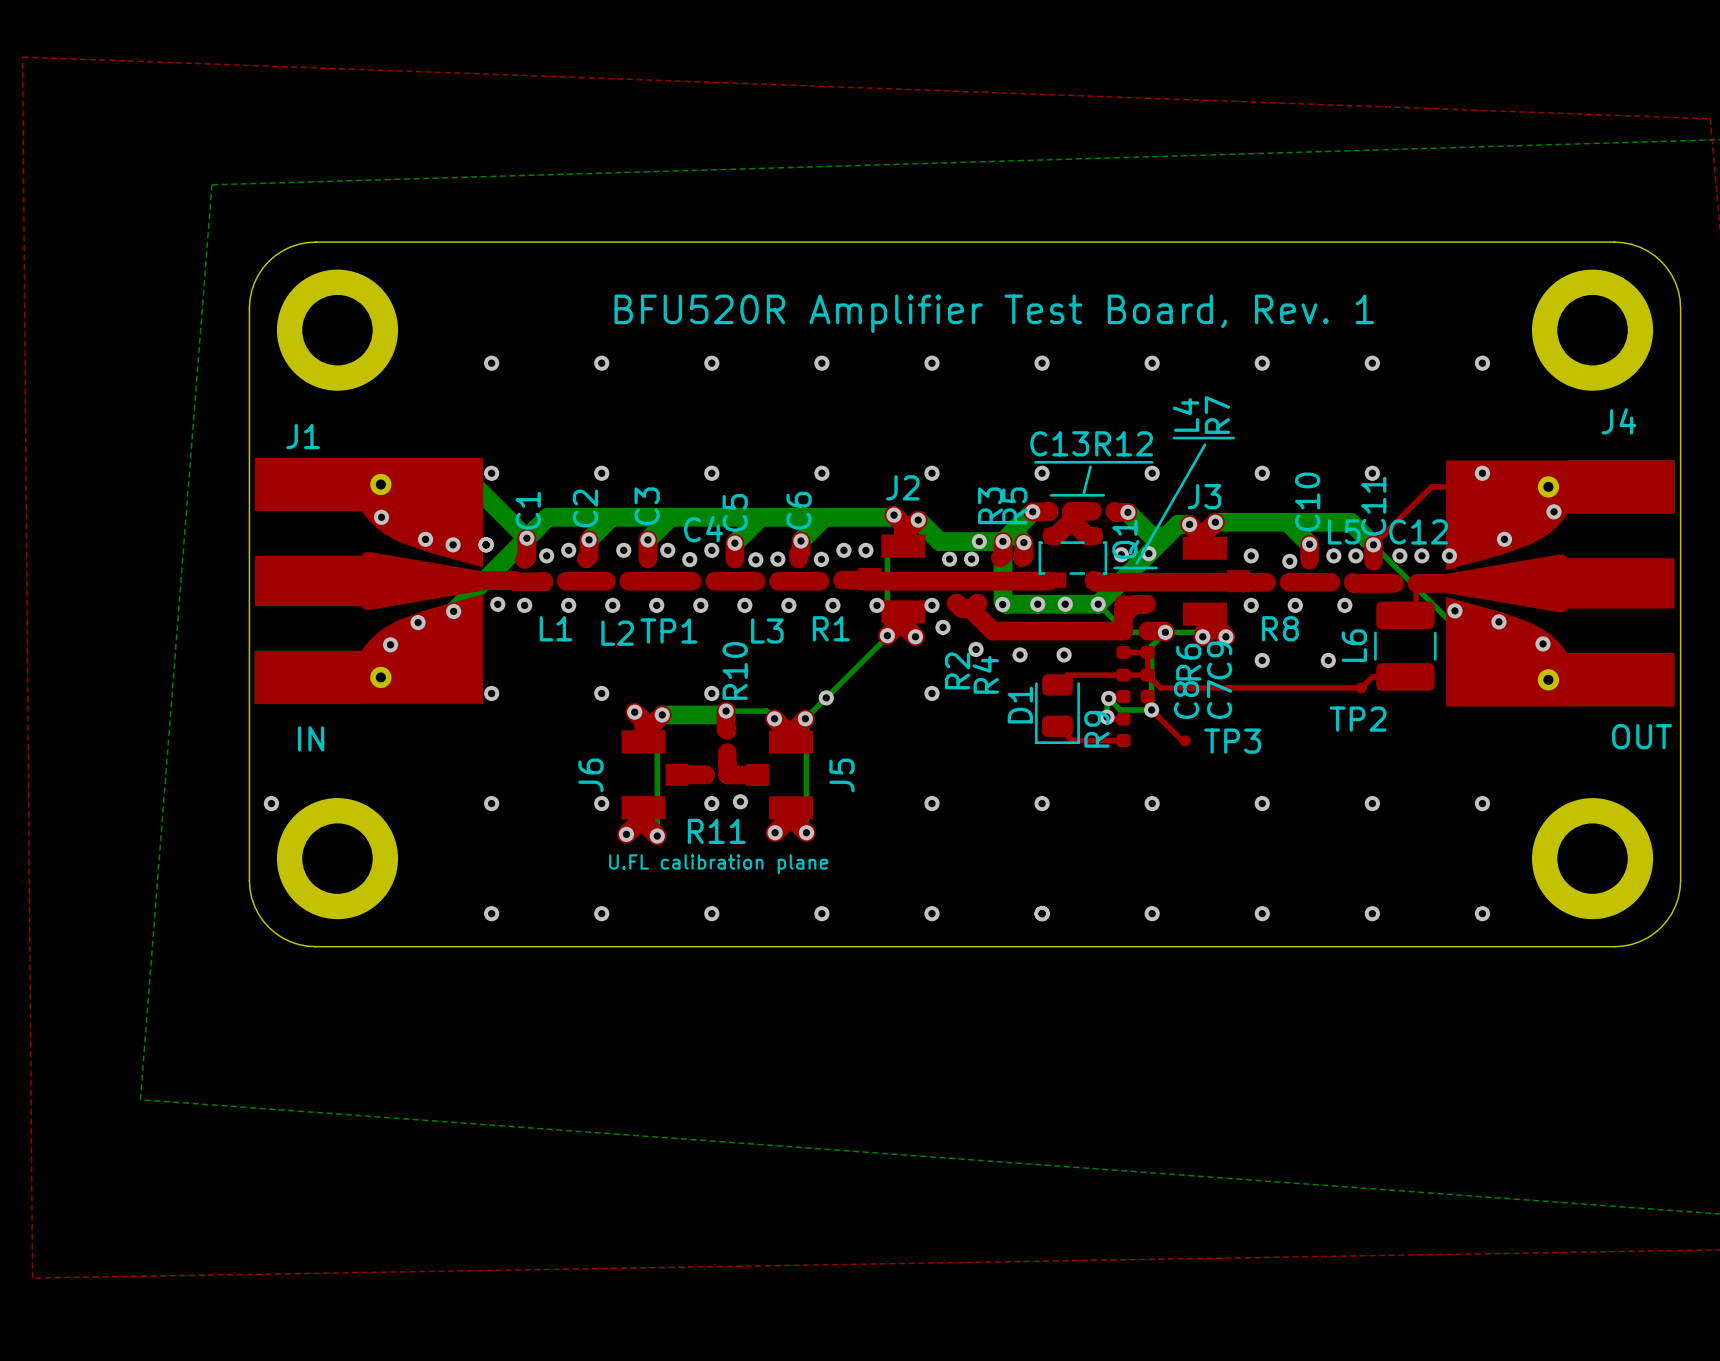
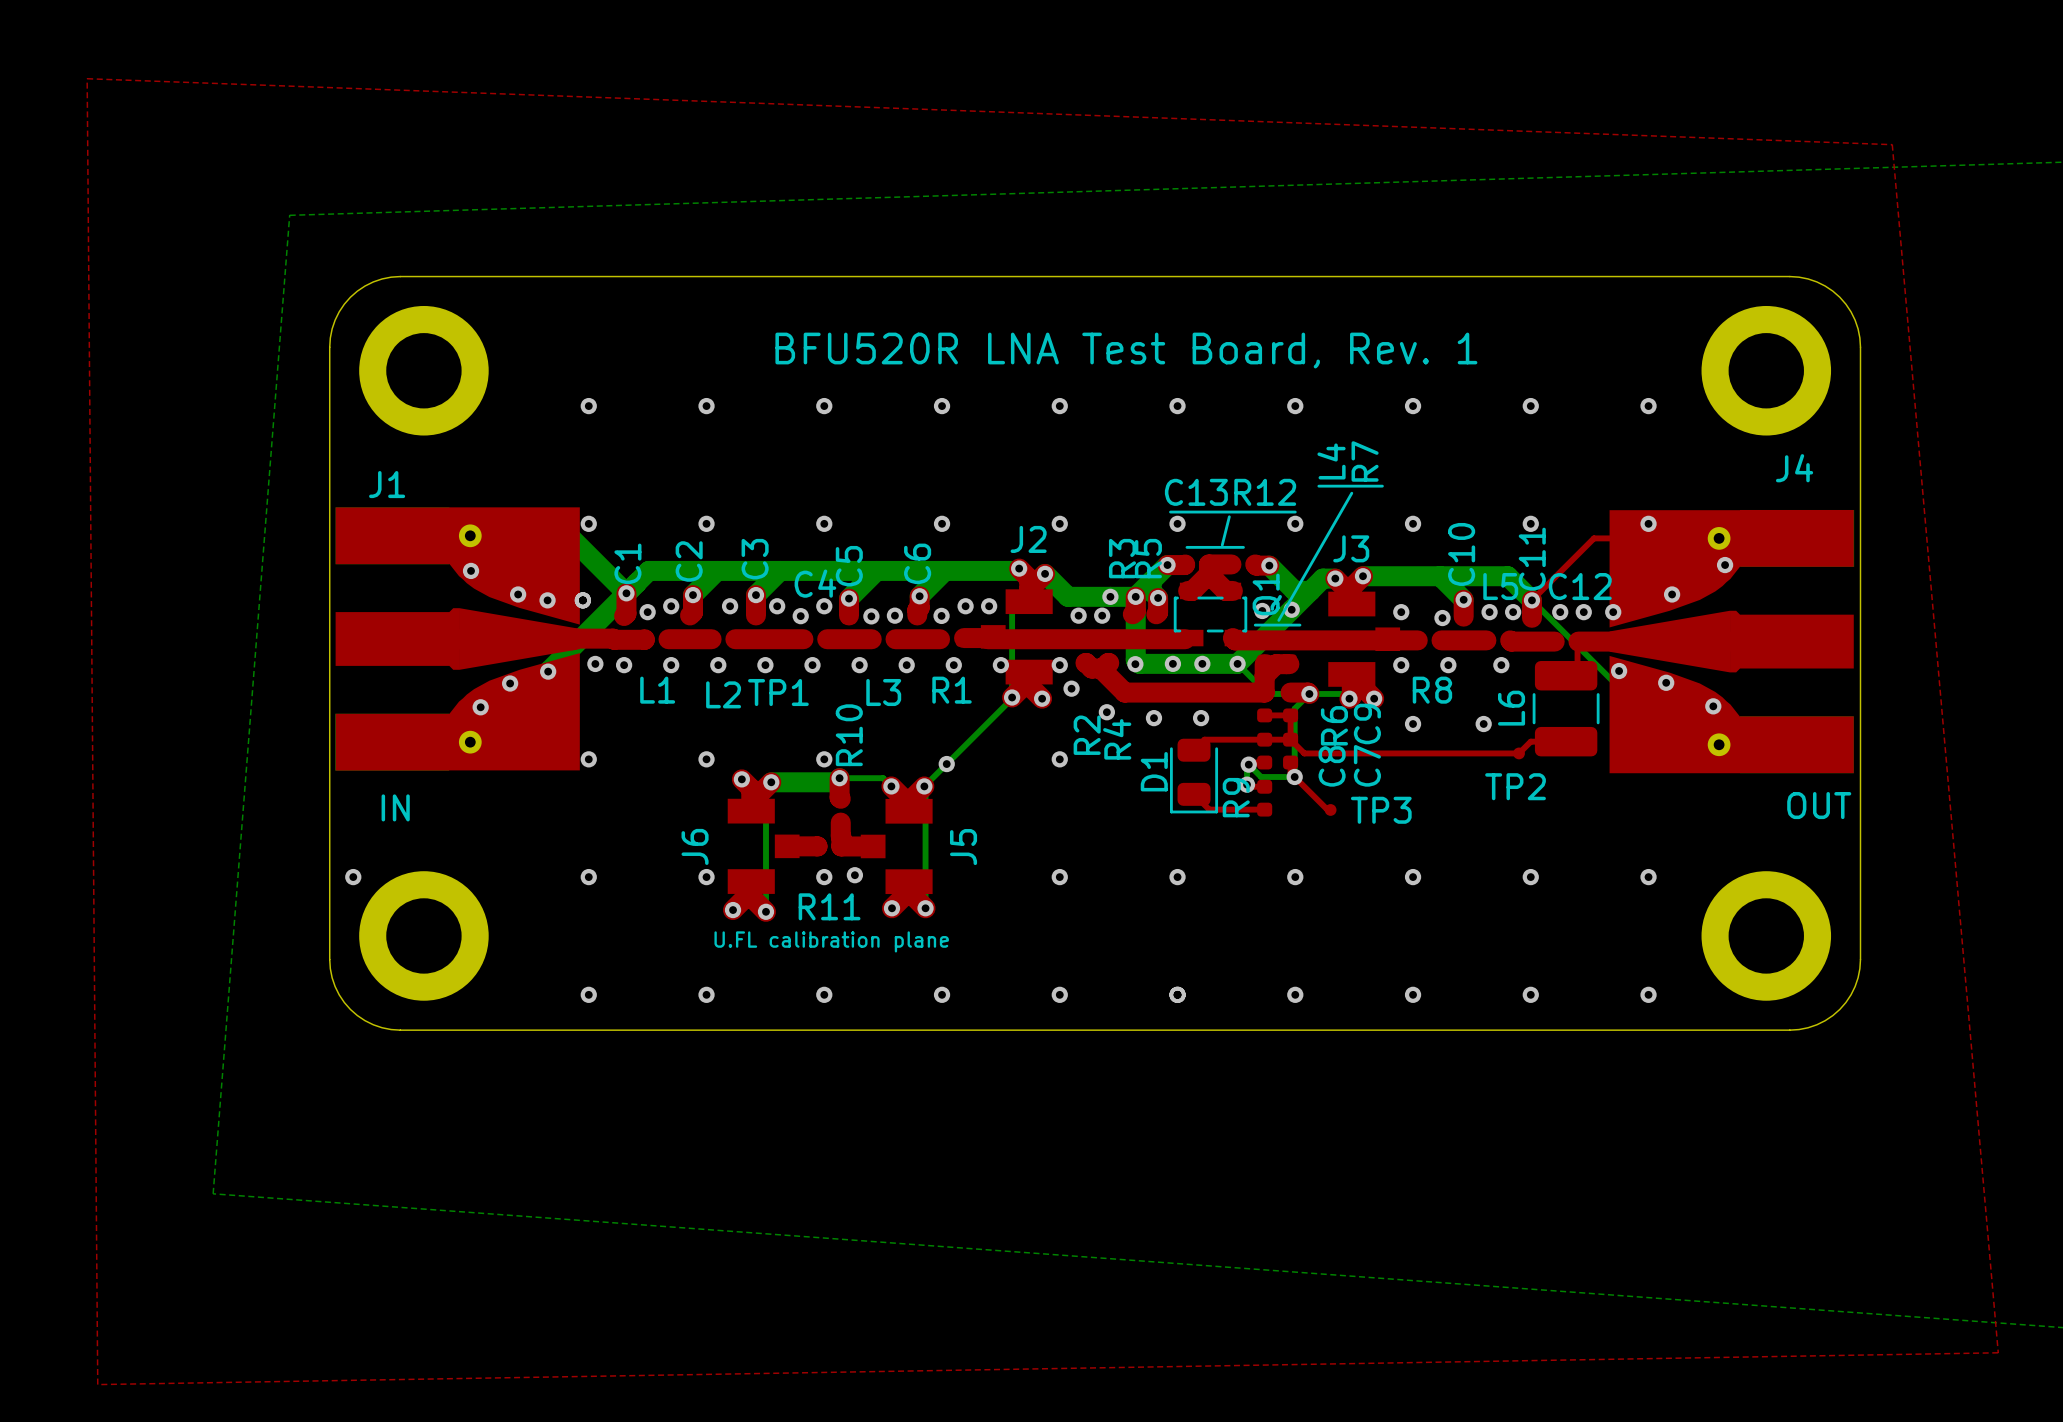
text: BFU520R Amplifier Test Board, Rev. 1 (994, 313) -> BFU520R LNA Test Board, Rev. 1 (1126, 350)

